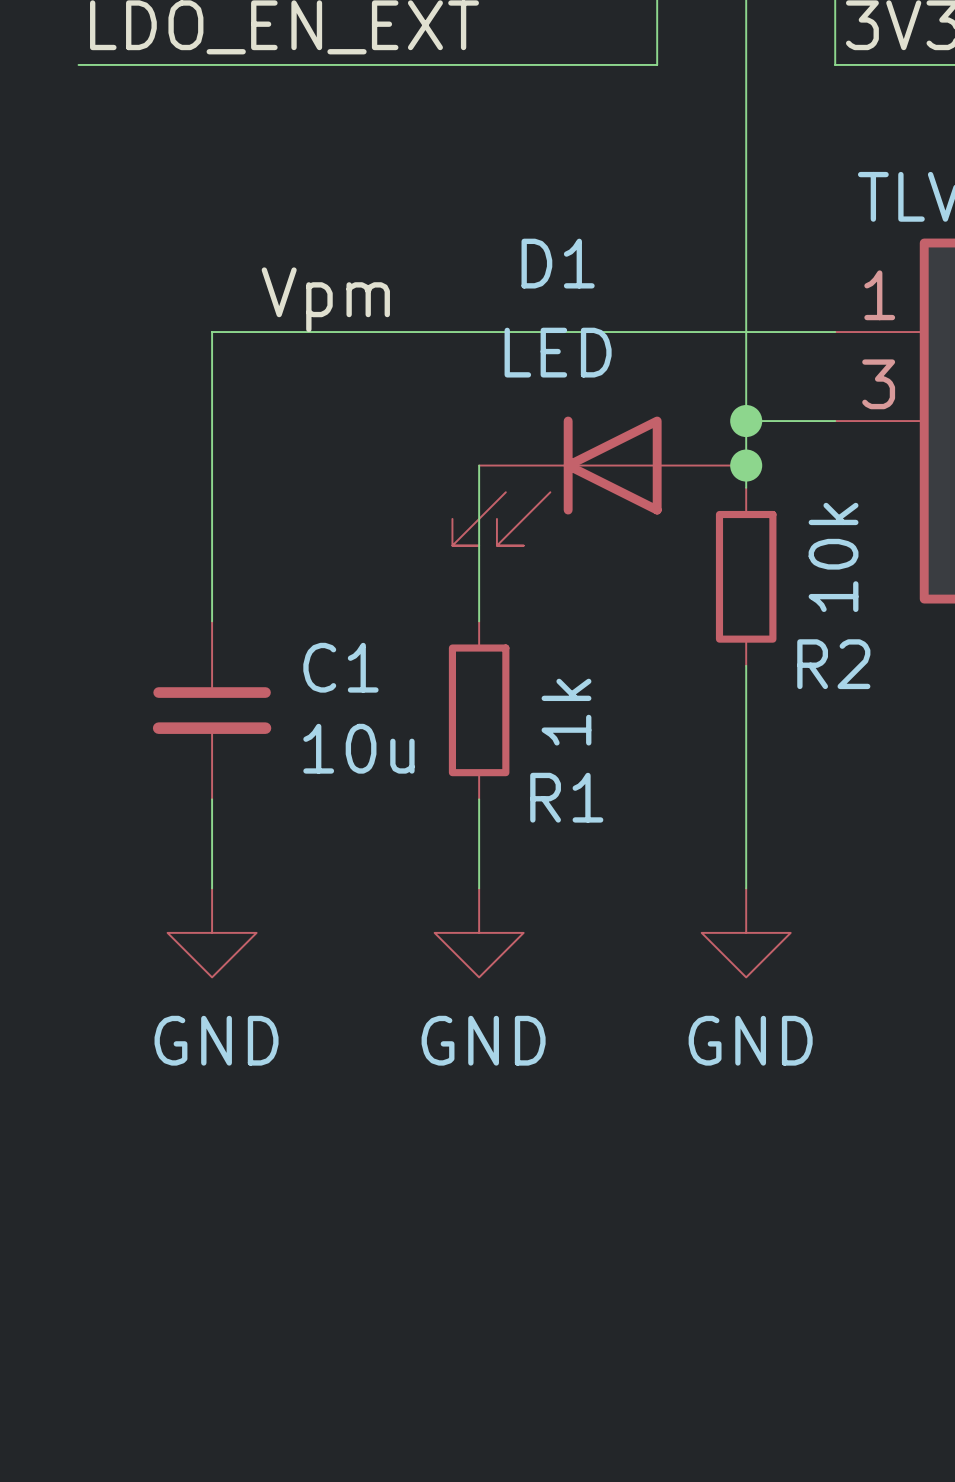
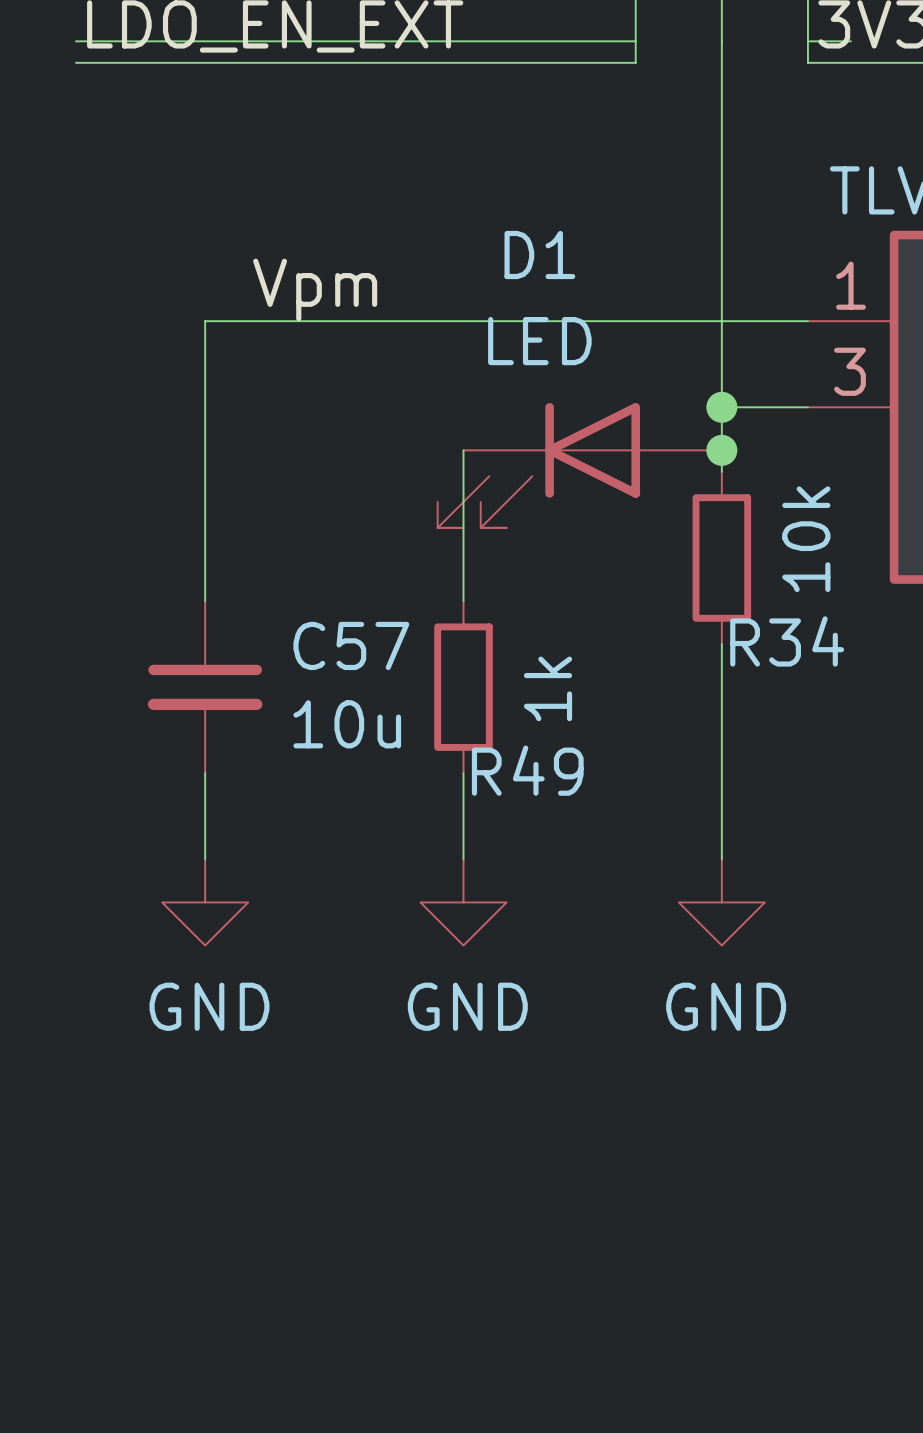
wire: none -> (76, 41) (635, 41)
wire: none -> (807, 41) (851, 41)
R2 name: R2 (833, 664) -> R34 (787, 641)
C1 name: C1 (340, 667) -> C57 (351, 645)
R1 name: R1 (566, 797) -> R49 (527, 770)

